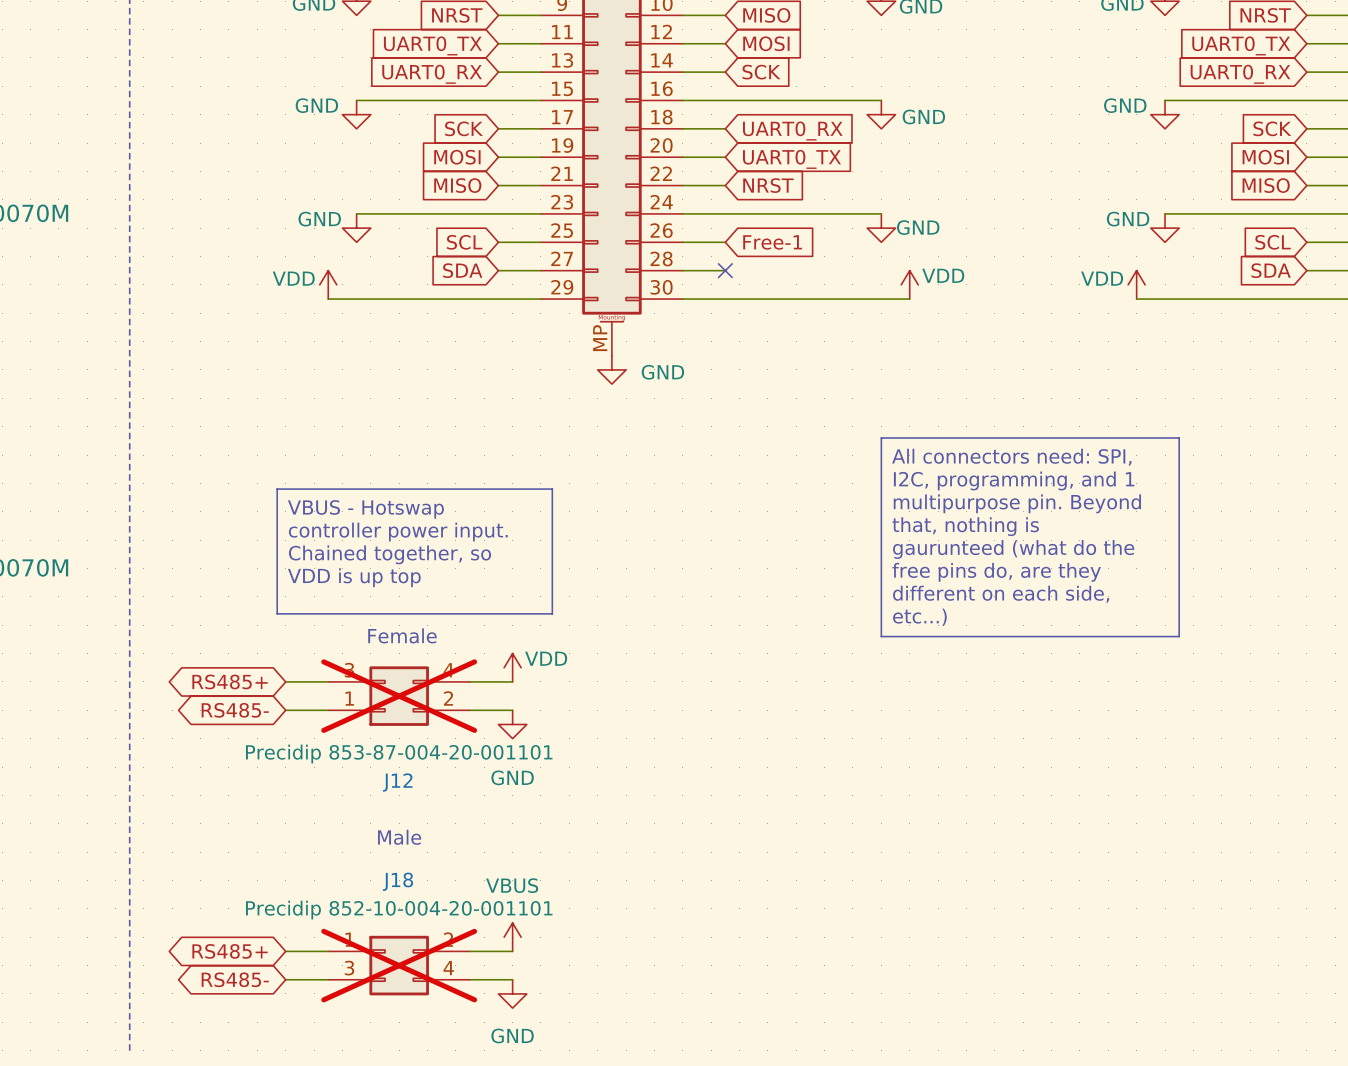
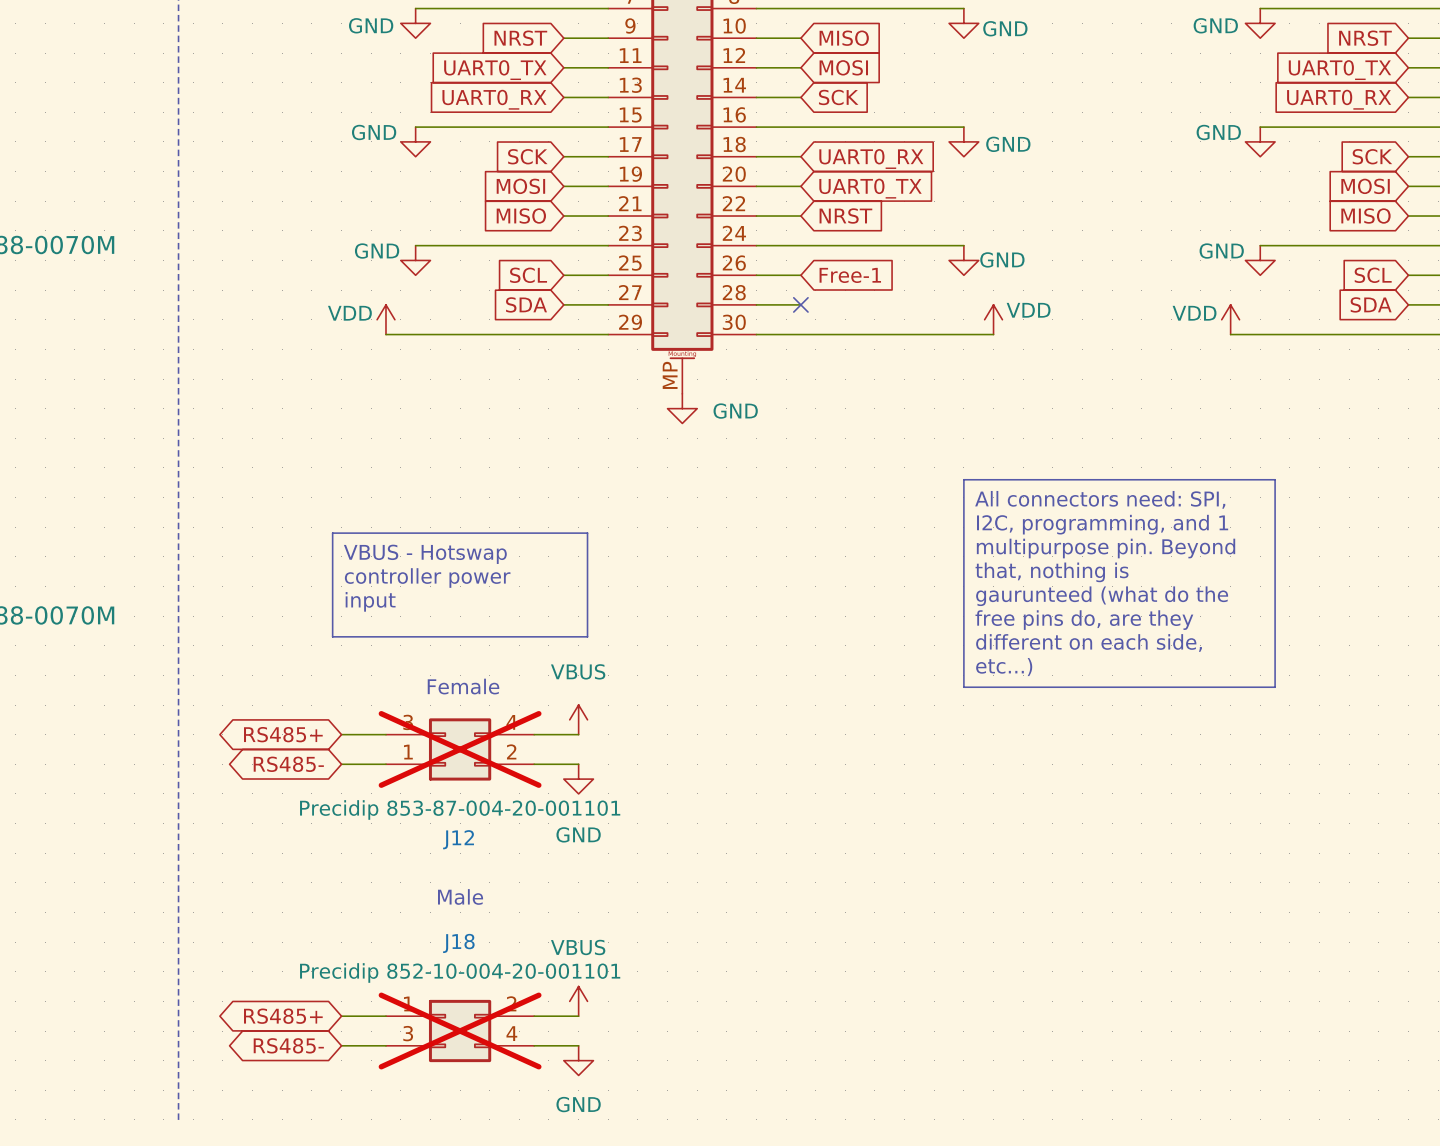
line: (521, 489) (552, 489) (552, 613) (277, 613) (277, 588) -> (587, 533) (587, 636) (332, 636)
text: controller power input. (398, 532) -> controller power (427, 578)
text: Chained together, so (389, 554) -> input (370, 601)
text: VDD is up top (354, 577) -> none
power symbol: VDD (512, 667) -> VBUS (578, 719)

